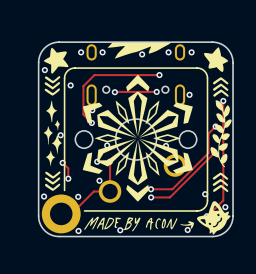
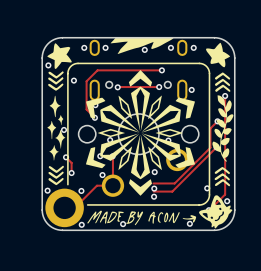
via: none -> (154, 172)
via: (150, 189) -> none
via: none -> (154, 188)
via: (151, 197) -> none
via: none -> (154, 196)

